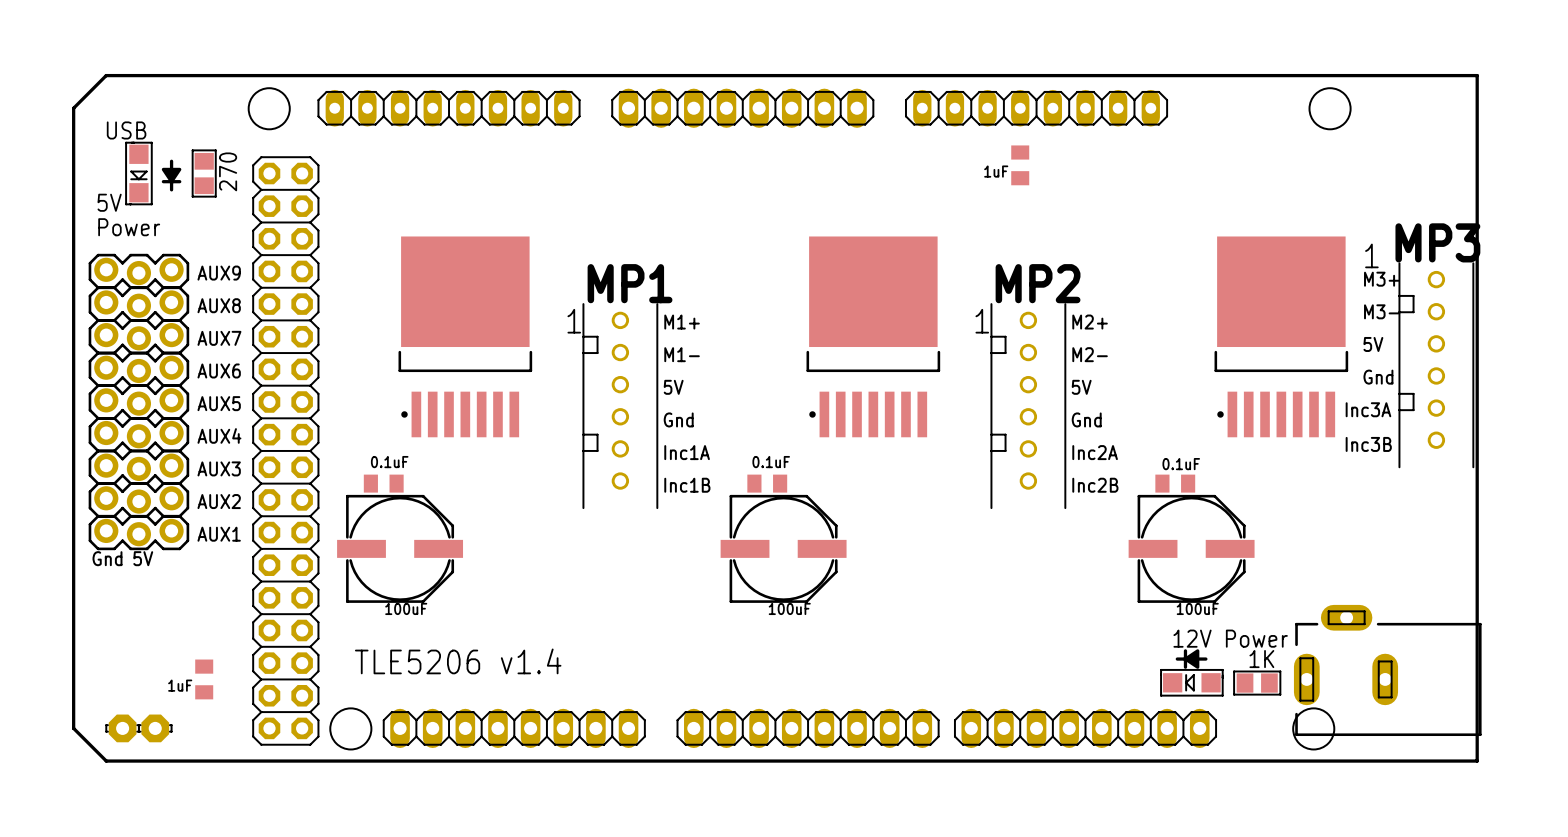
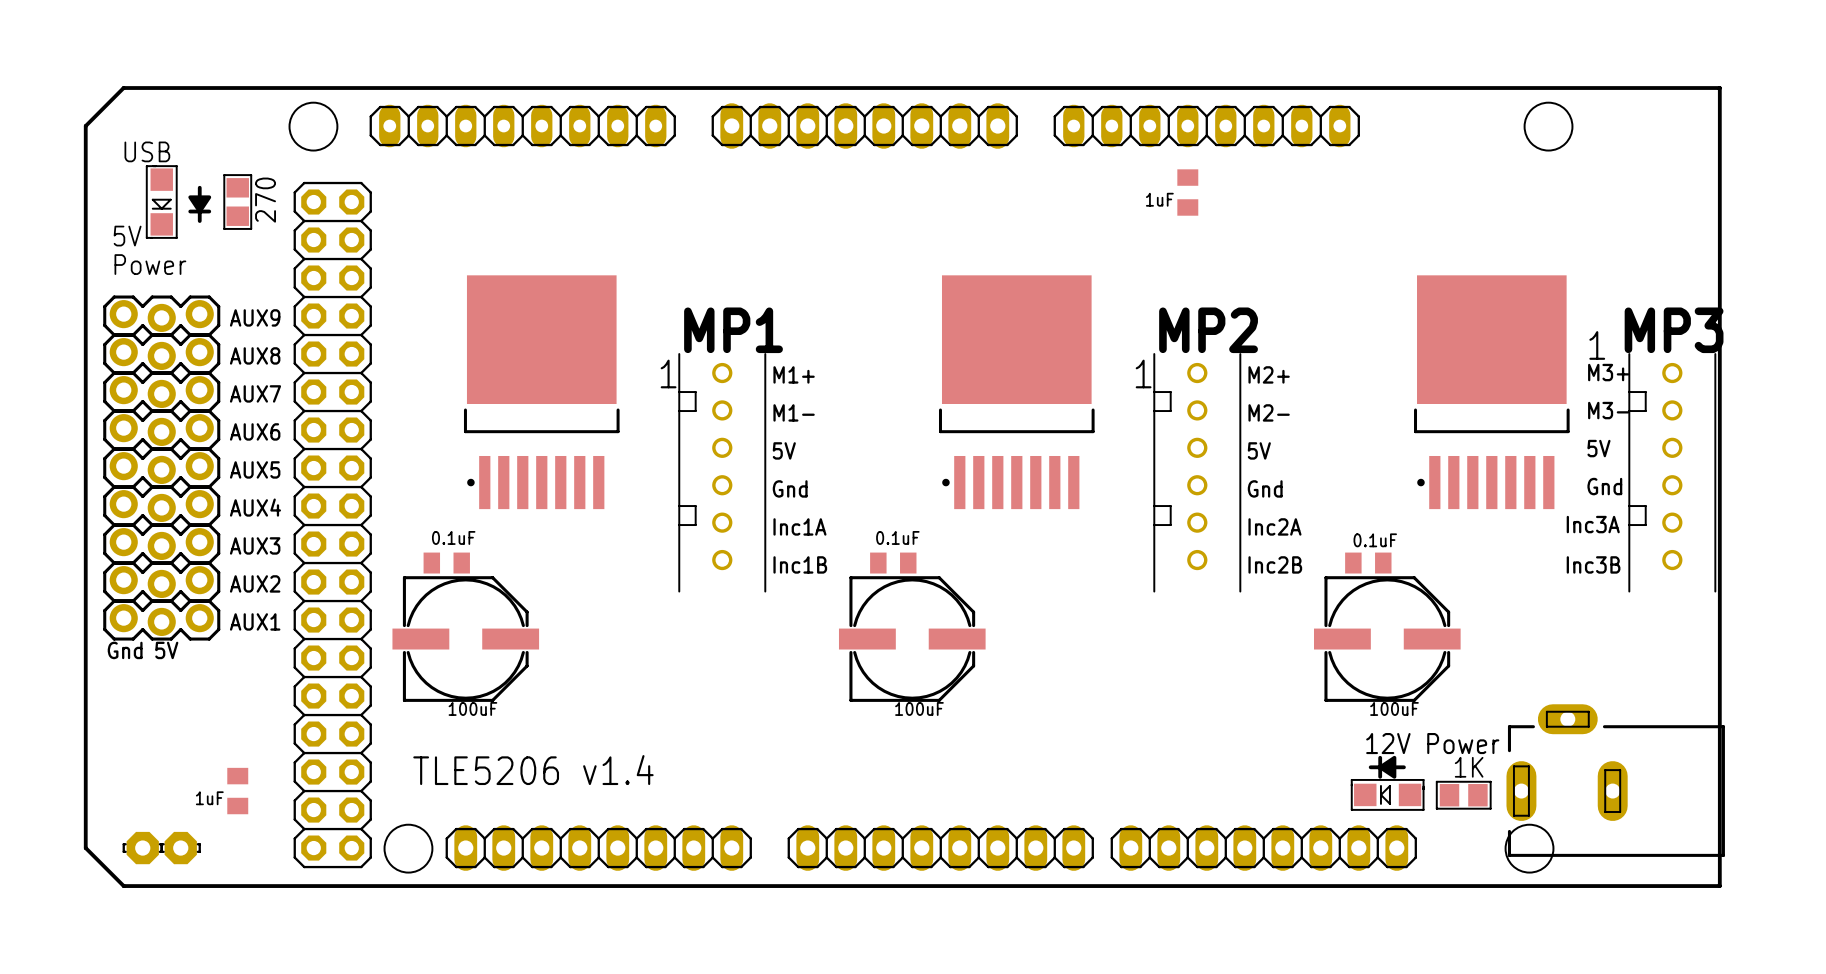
text position: MP3 (1437, 242) -> MP3 (1674, 330)
text position: 1 (1371, 255) -> 1 (1597, 345)
text position: M3+ (1381, 279) -> M3+ (1608, 372)
text: M3- (1381, 311) -> none
text: 5V (1373, 344) -> M3- (1608, 410)
part position: (1436, 365) -> (1672, 472)
text: Gnd (1378, 377) -> 5V (1598, 448)
text: Inc3A (1368, 409) -> none
text: none -> Gnd (1604, 486)
text: Inc3B (1368, 444) -> Inc3A (1593, 524)
text: none -> Inc3B (1593, 564)

